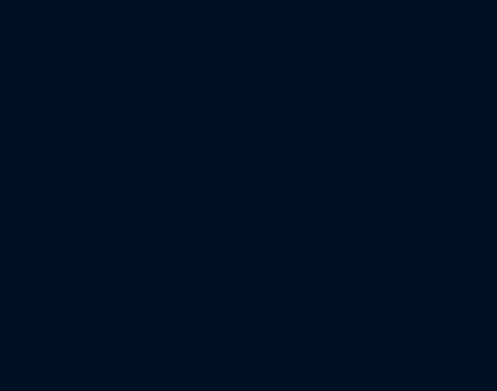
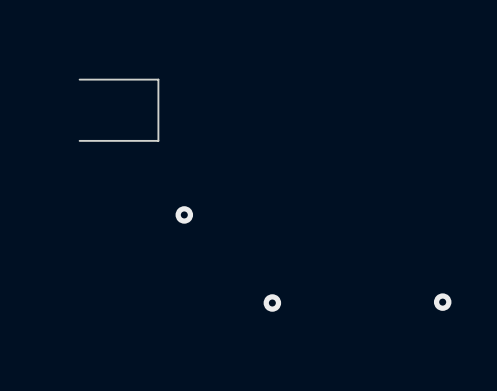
part: none -> (119, 110)
via: none -> (184, 214)
via: none -> (272, 302)
via: none -> (442, 302)

